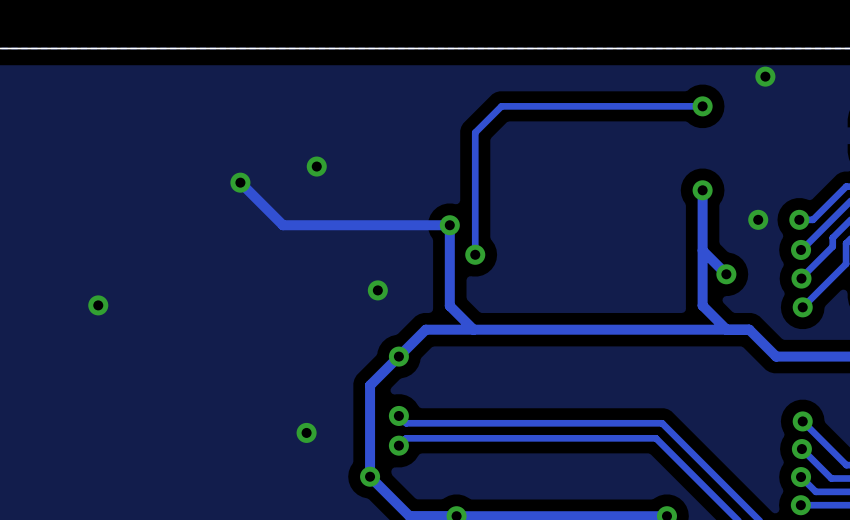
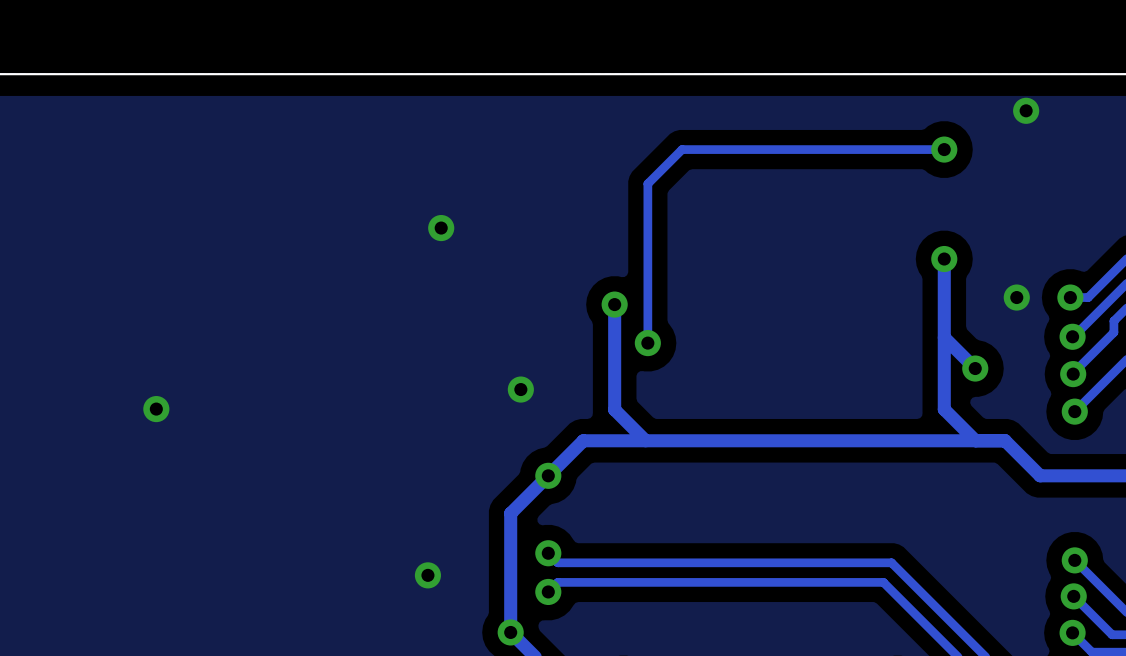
track: (240, 182) (282, 225) (449, 225) -> none
via: (240, 182) -> none

